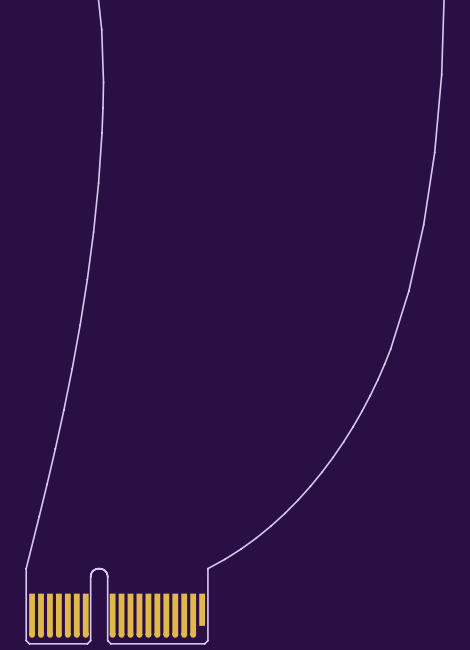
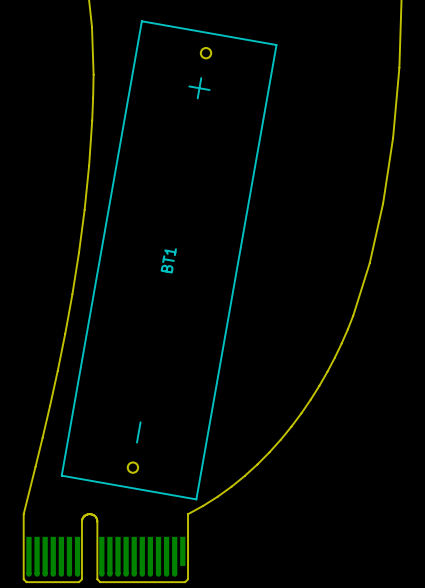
BT1: none -> (169, 260)

